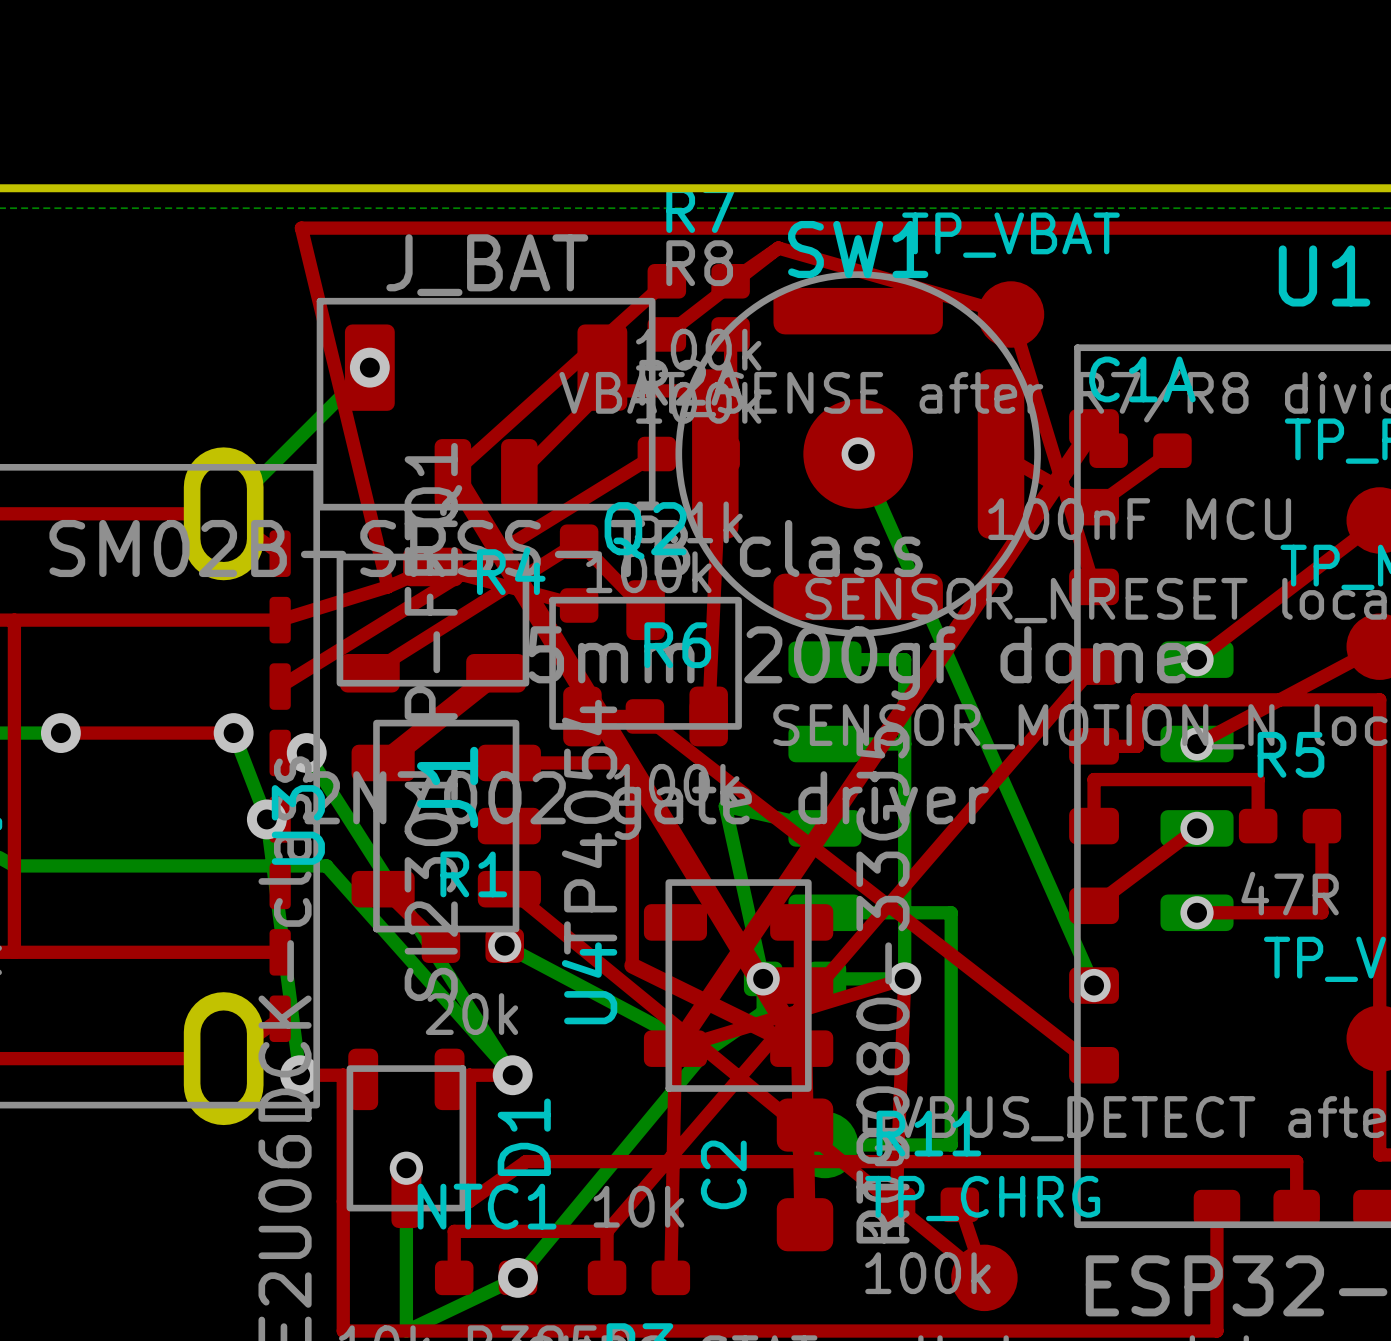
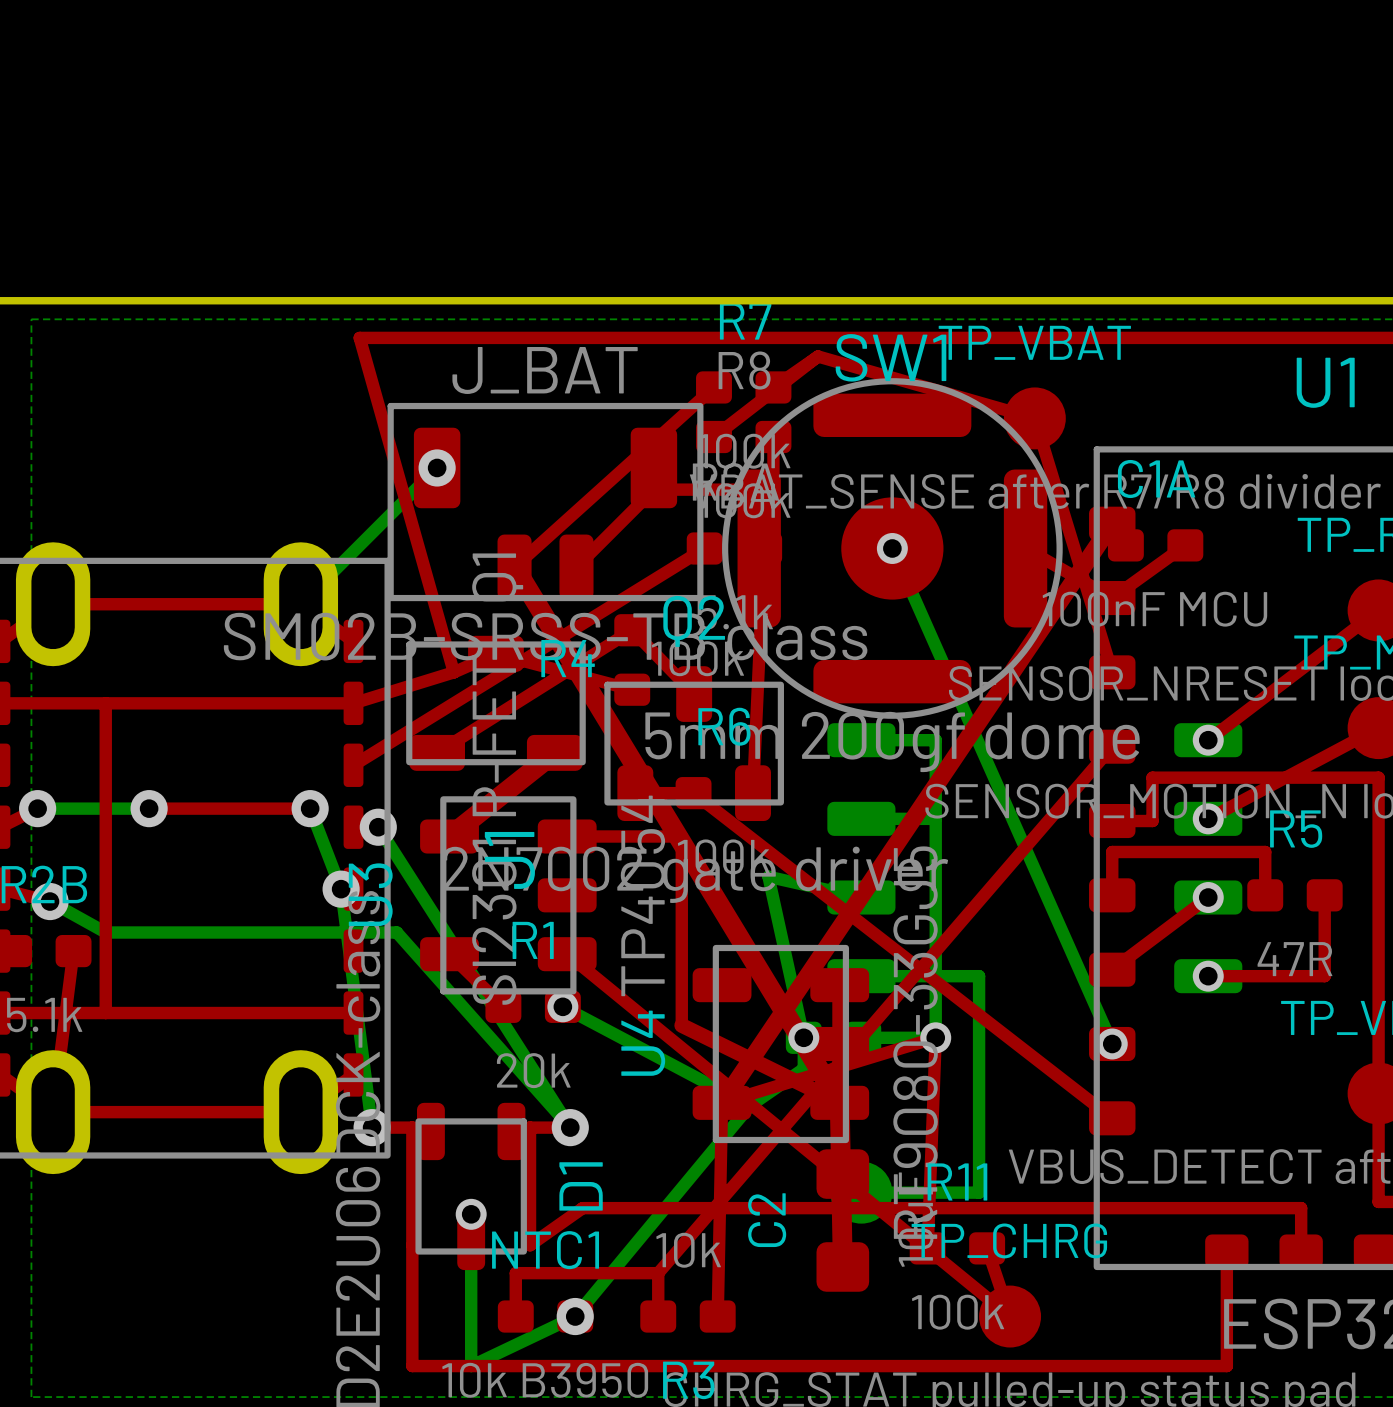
top track: (301, 228) (387, 586) -> (373, 337) (359, 337) (453, 672)

